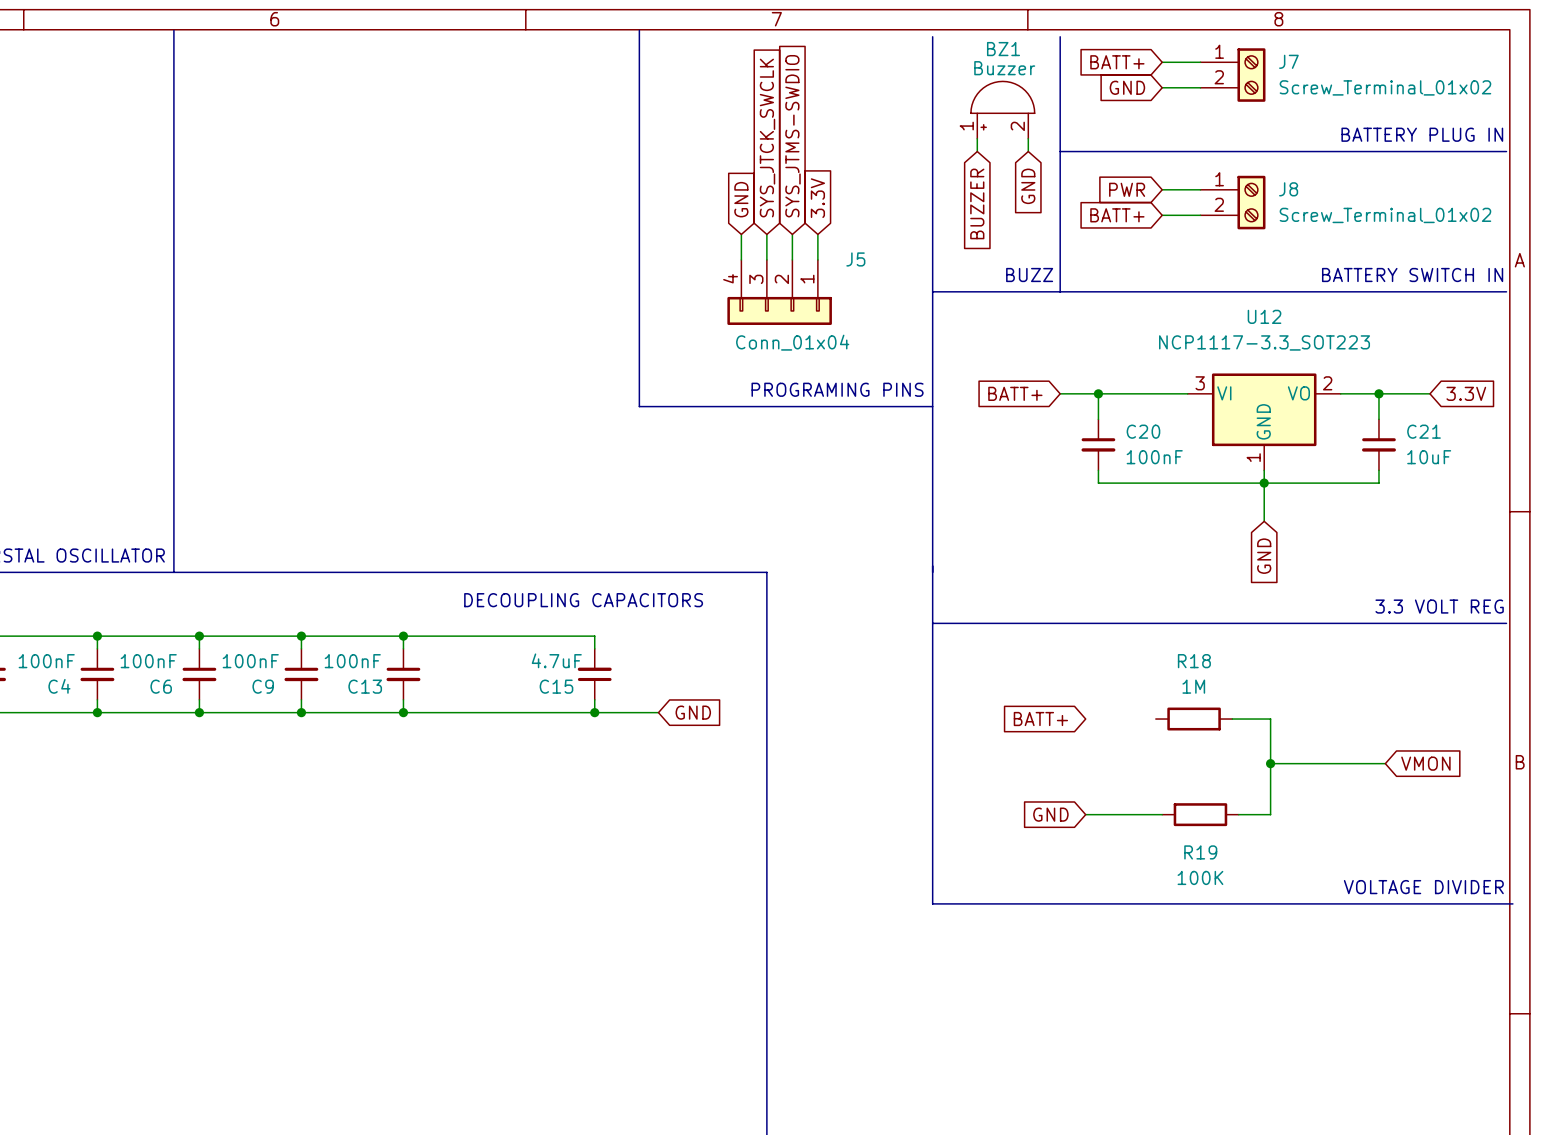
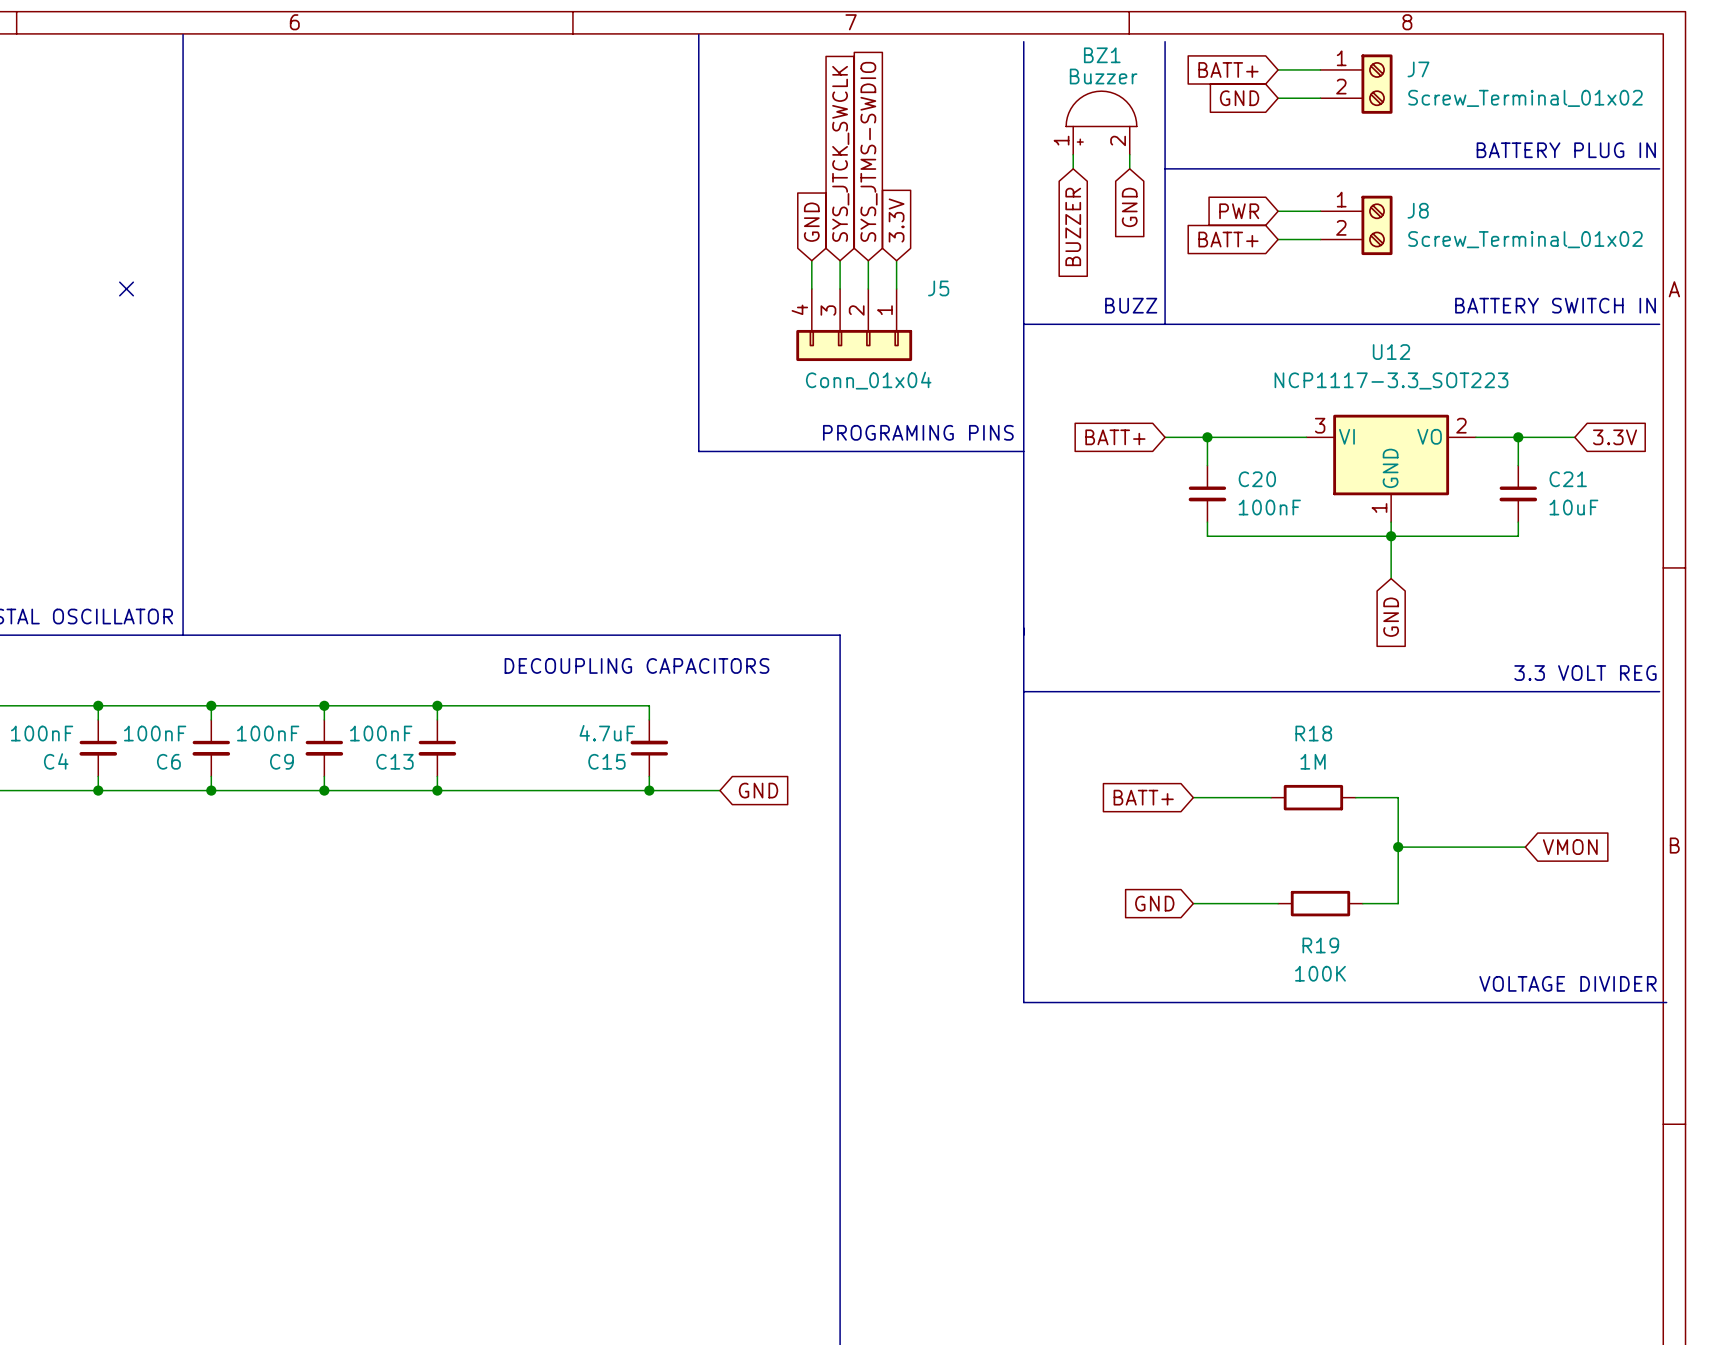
no-connect mark: none -> (126, 288)
wire: none -> (1193, 797) (1271, 797)

